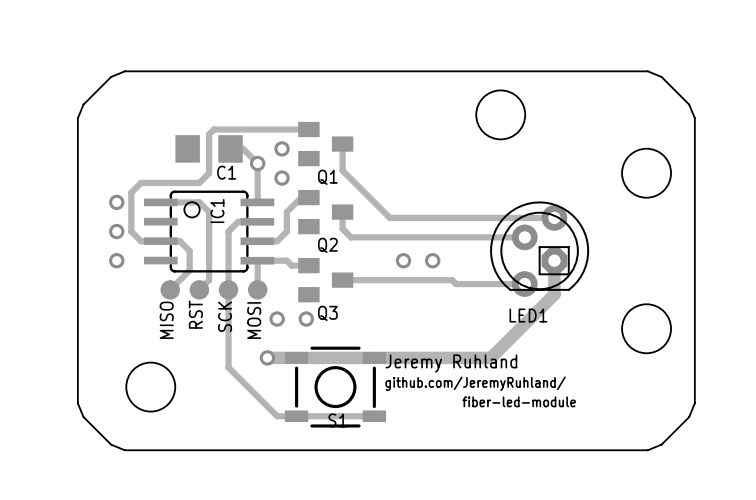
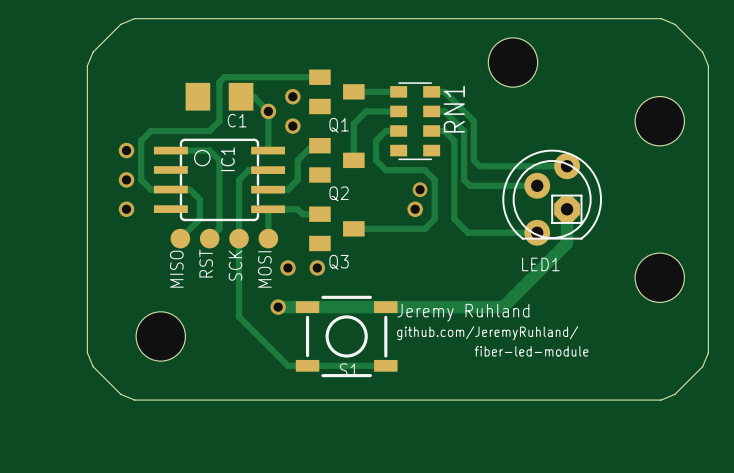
track: (342, 144) (342, 170) (389, 217) (467, 217) -> (431, 91) (444, 91) (473, 121) (473, 160) (479, 166)
track: none -> (353, 91) (398, 91)
track: none -> (398, 111) (366, 111) (353, 123) (353, 160)
RN1: none -> (415, 121)
track: none -> (398, 130) (385, 130) (376, 140) (376, 160) (385, 170) (424, 170) (434, 179) (434, 219) (424, 228)
track: (342, 212) (342, 228) (351, 237) (457, 237) -> (431, 111) (444, 111) (464, 130) (464, 179) (469, 185)
via: none -> (420, 189)
via: (432, 260) -> none
track: (413, 280) (452, 280) -> (431, 130) (444, 130) (454, 140) (454, 219) (464, 228)

